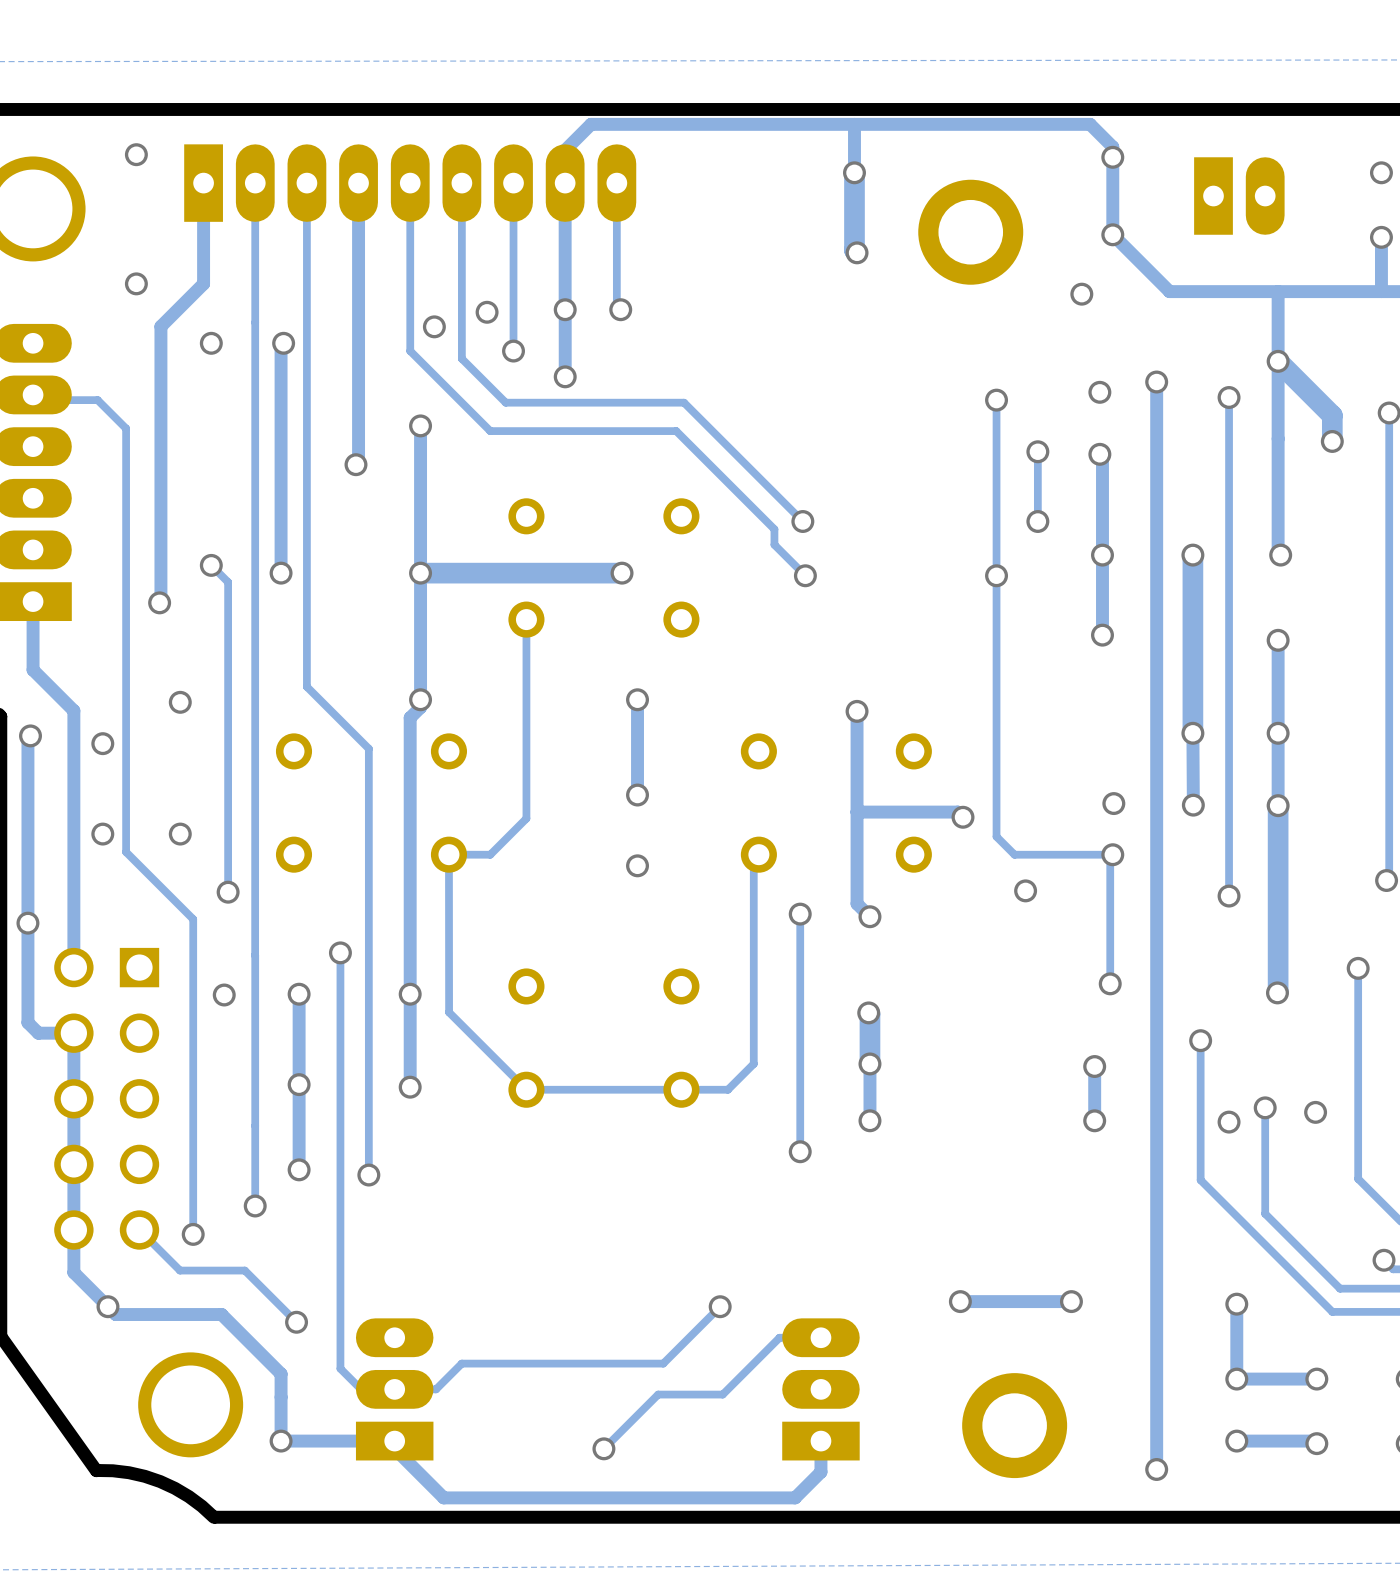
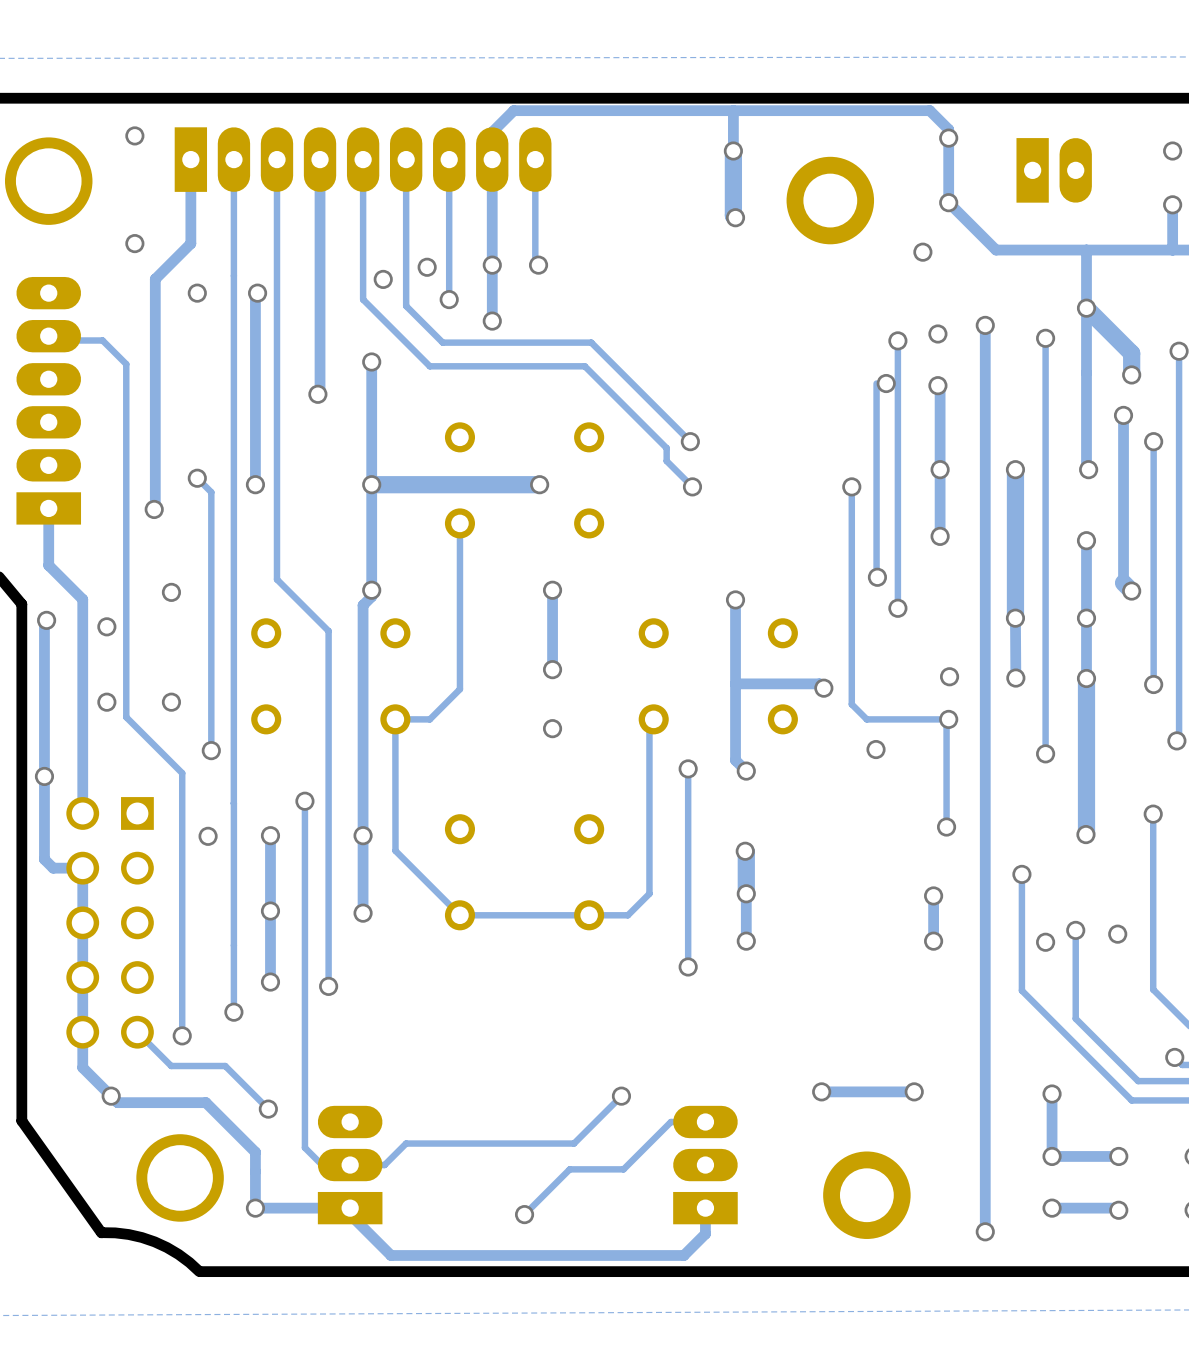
track: (996, 400) (996, 575) -> none
via position: (996, 400) -> (897, 340)
track: none -> (897, 340) (897, 608)
track: none -> (876, 383) (877, 577)
track: (1037, 451) (1037, 521) -> none
track: none -> (1123, 415) (1123, 582) (1131, 591)
via: none -> (1123, 415)
via: (1037, 521) -> none
track: none -> (1153, 441) (1153, 684)
via: none -> (1153, 441)
via: none -> (877, 577)
via: none -> (1131, 591)
via: none -> (897, 608)
via: none -> (1153, 684)

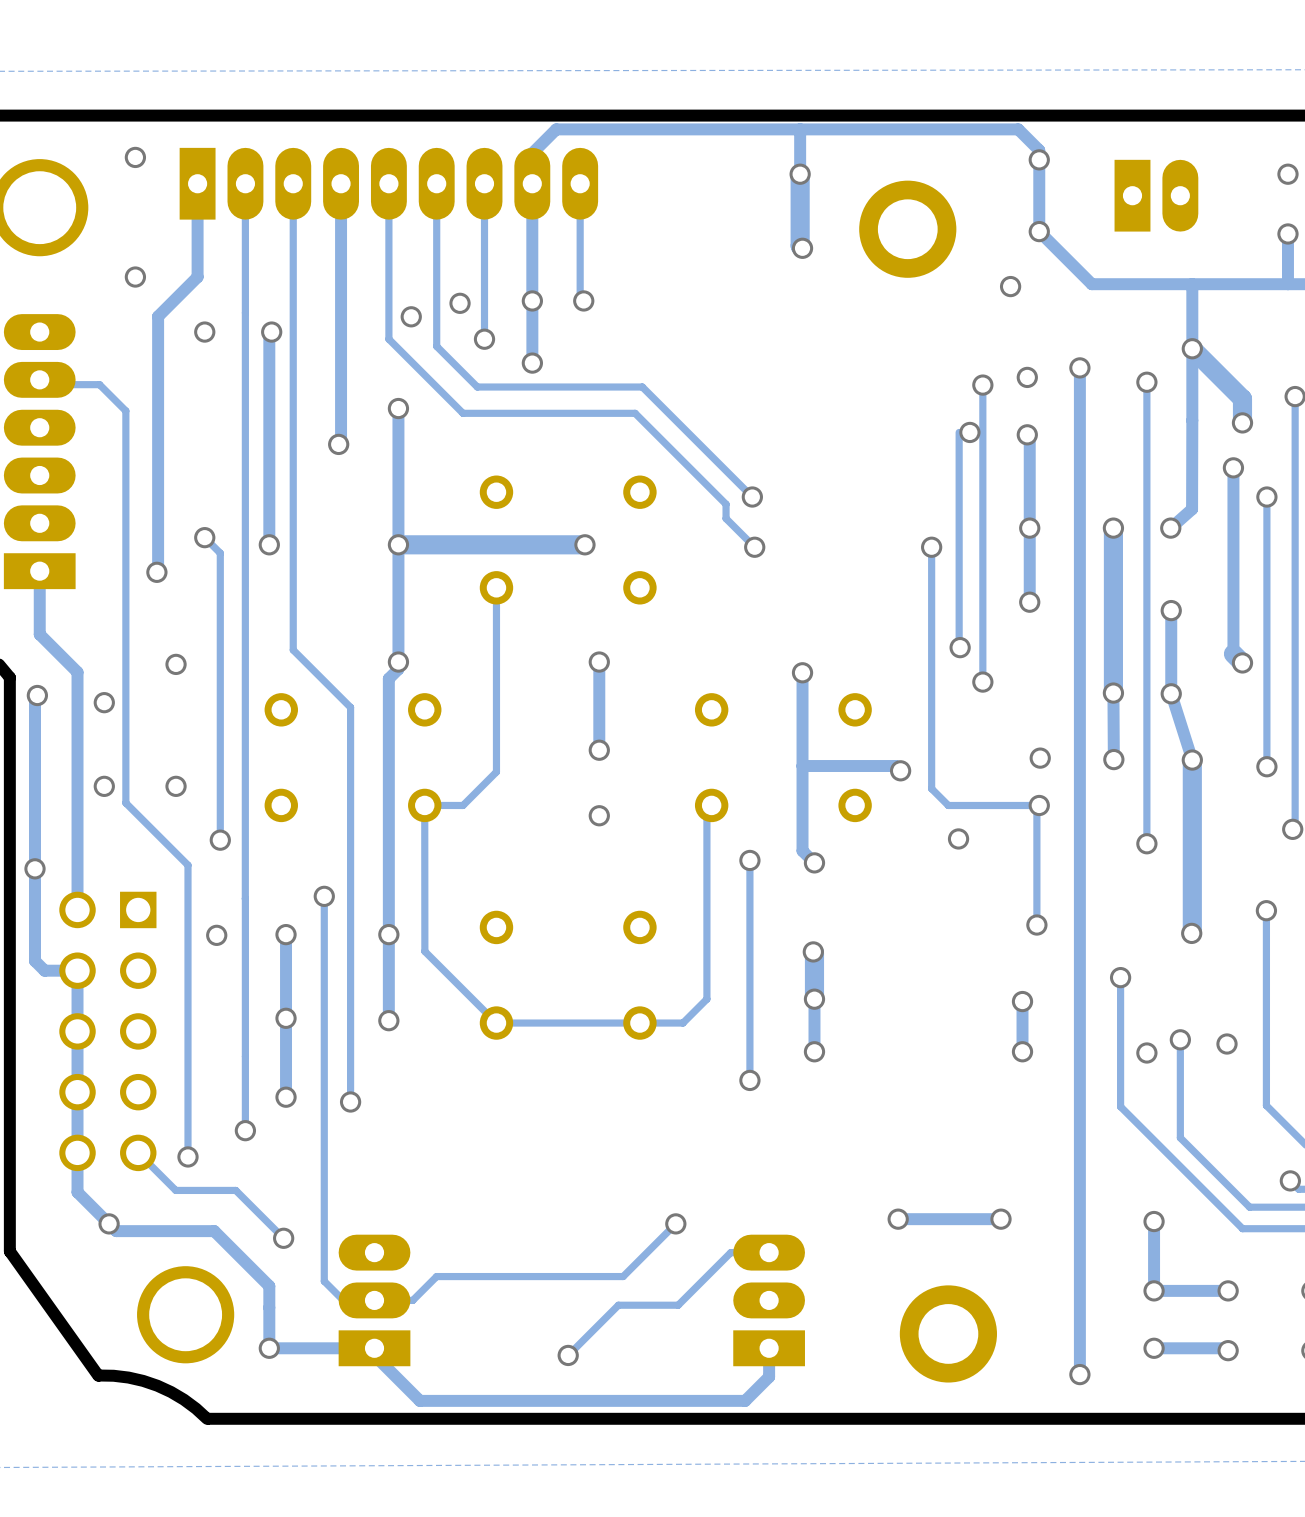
track: (1086, 372) (1086, 467) (1088, 469) -> (1192, 420) (1192, 509) (1170, 528)
via position: (1088, 469) -> (1170, 528)
track: (1086, 540) (1086, 678) -> (1171, 610) (1171, 693) (1192, 760)
via position: (1086, 540) -> (1171, 610)
via position: (1086, 618) -> (1171, 693)

